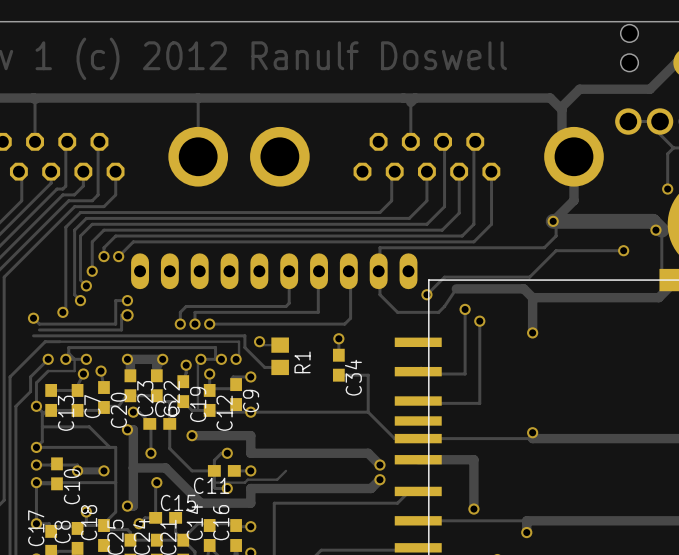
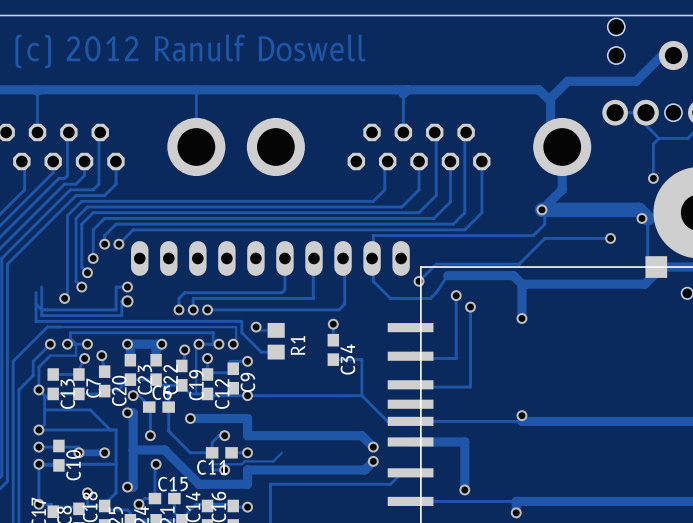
track: none -> (41, 287) (41, 315)
track: none -> (36, 292) (36, 321)
via: (33, 318) -> none

